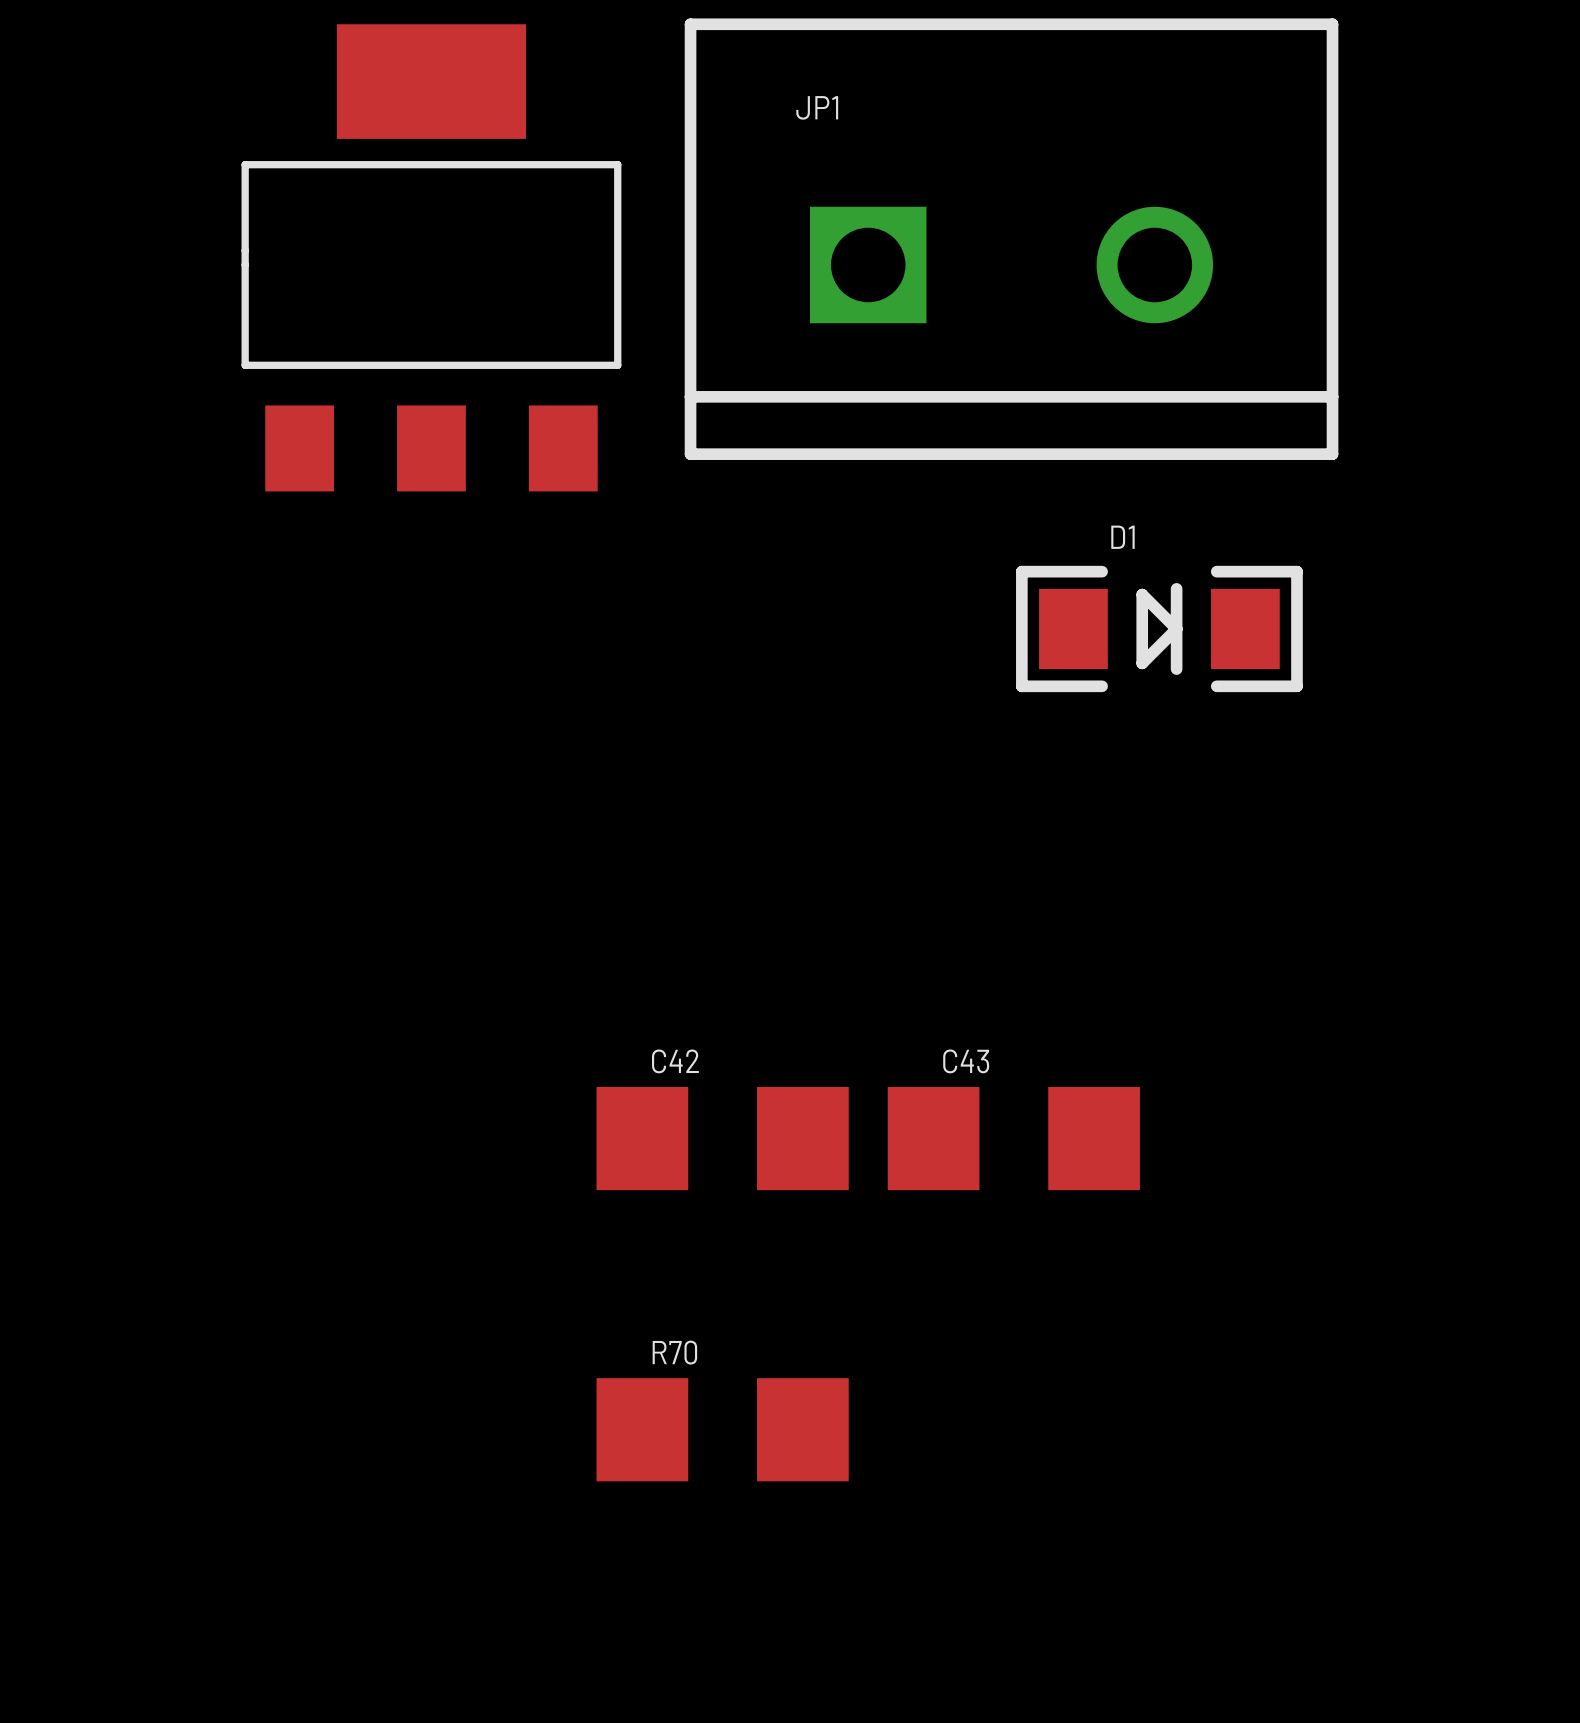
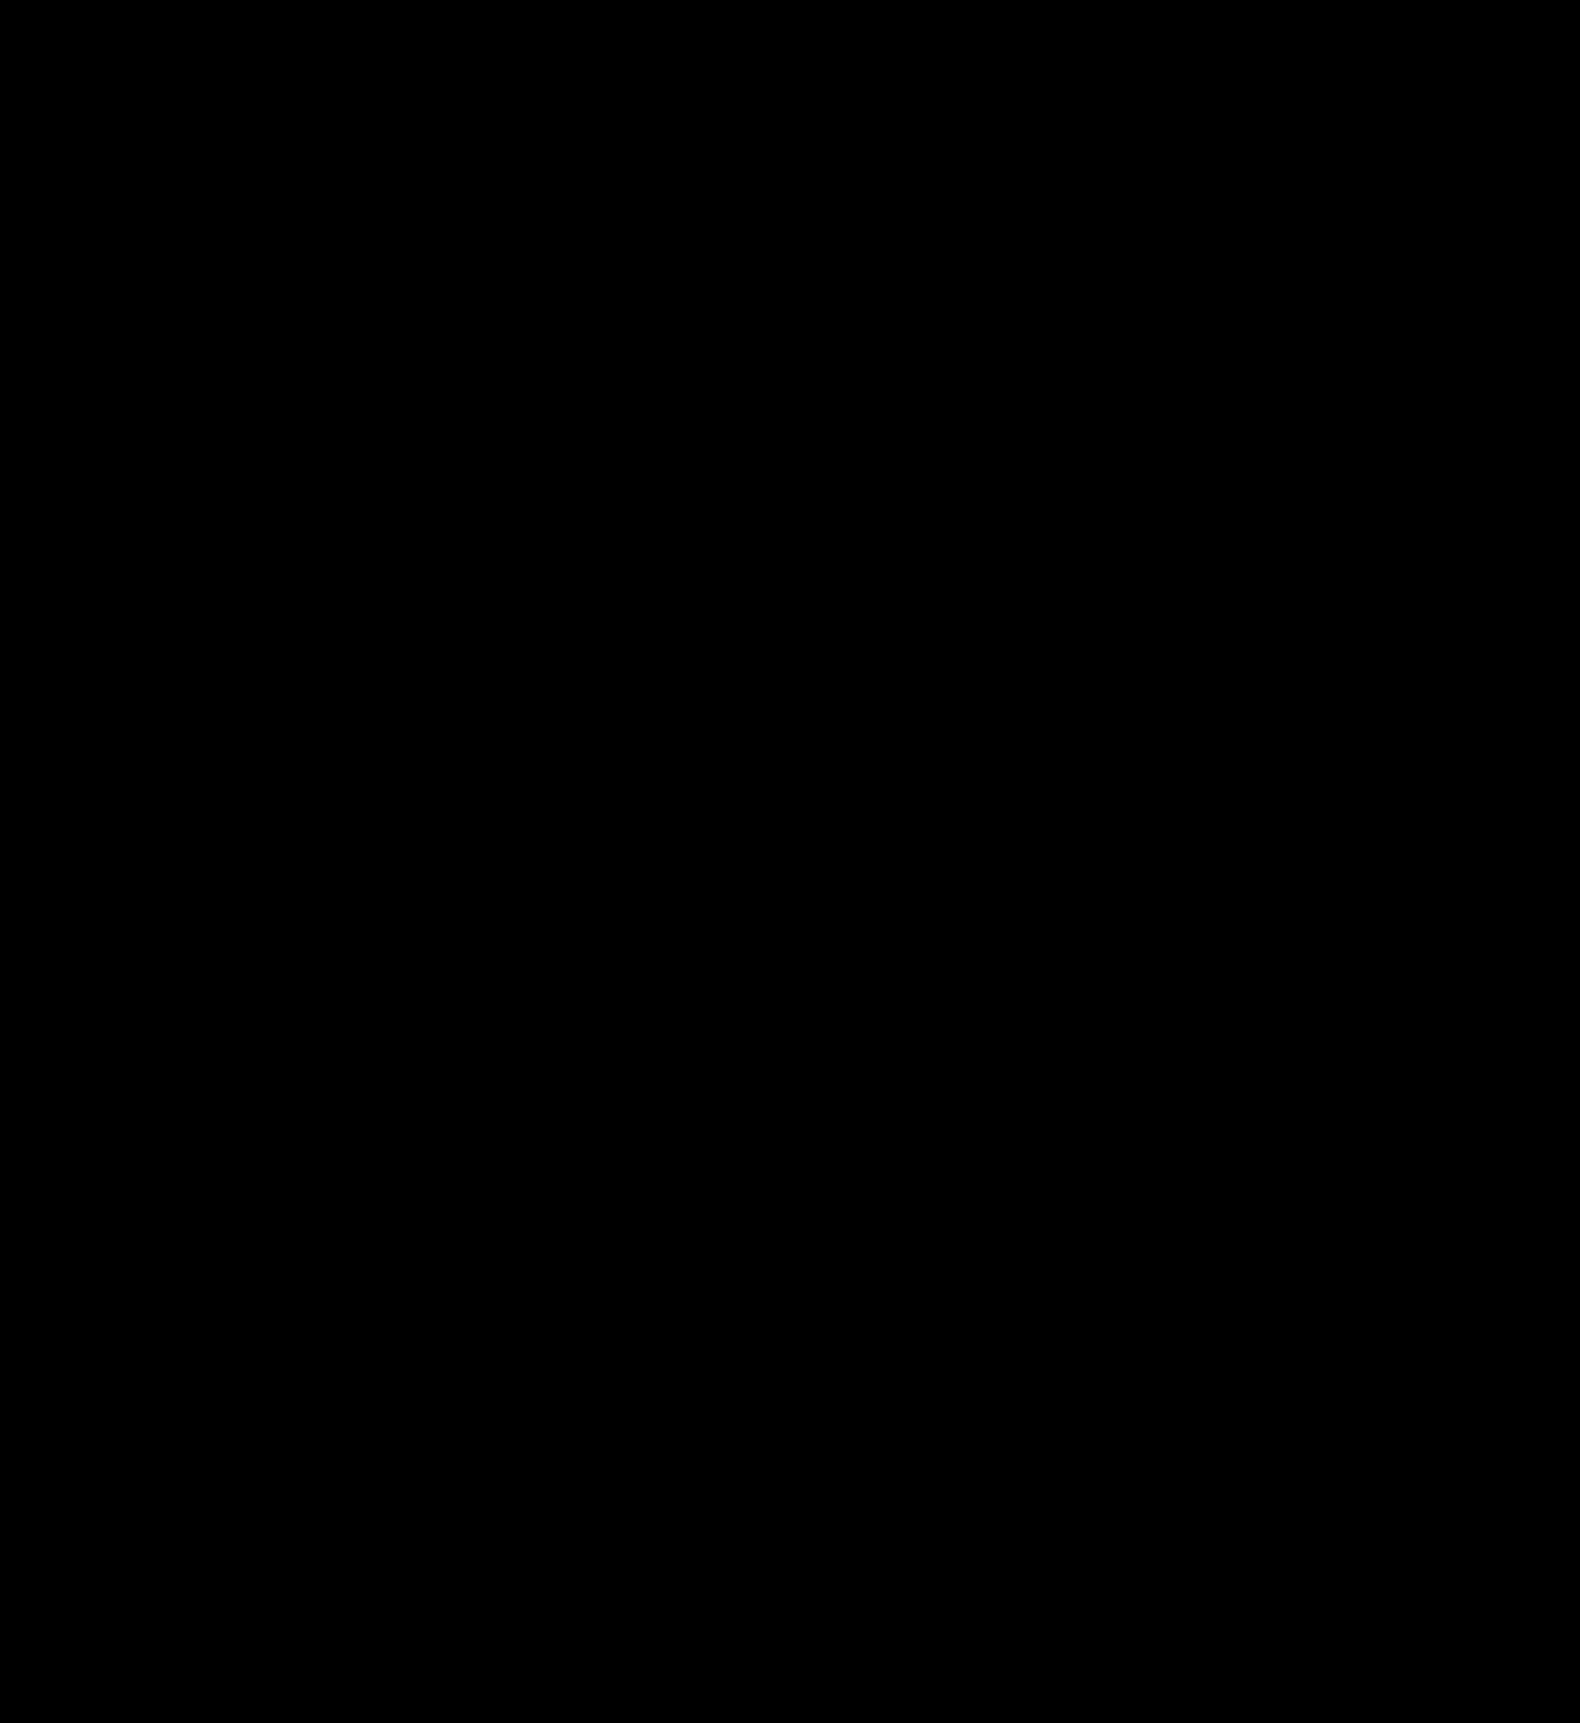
JP1: (1011, 239) -> none
part: (431, 257) -> none
D1: (1159, 628) -> none
C42: (722, 1138) -> none
C43: (1013, 1138) -> none
R70: (722, 1429) -> none

